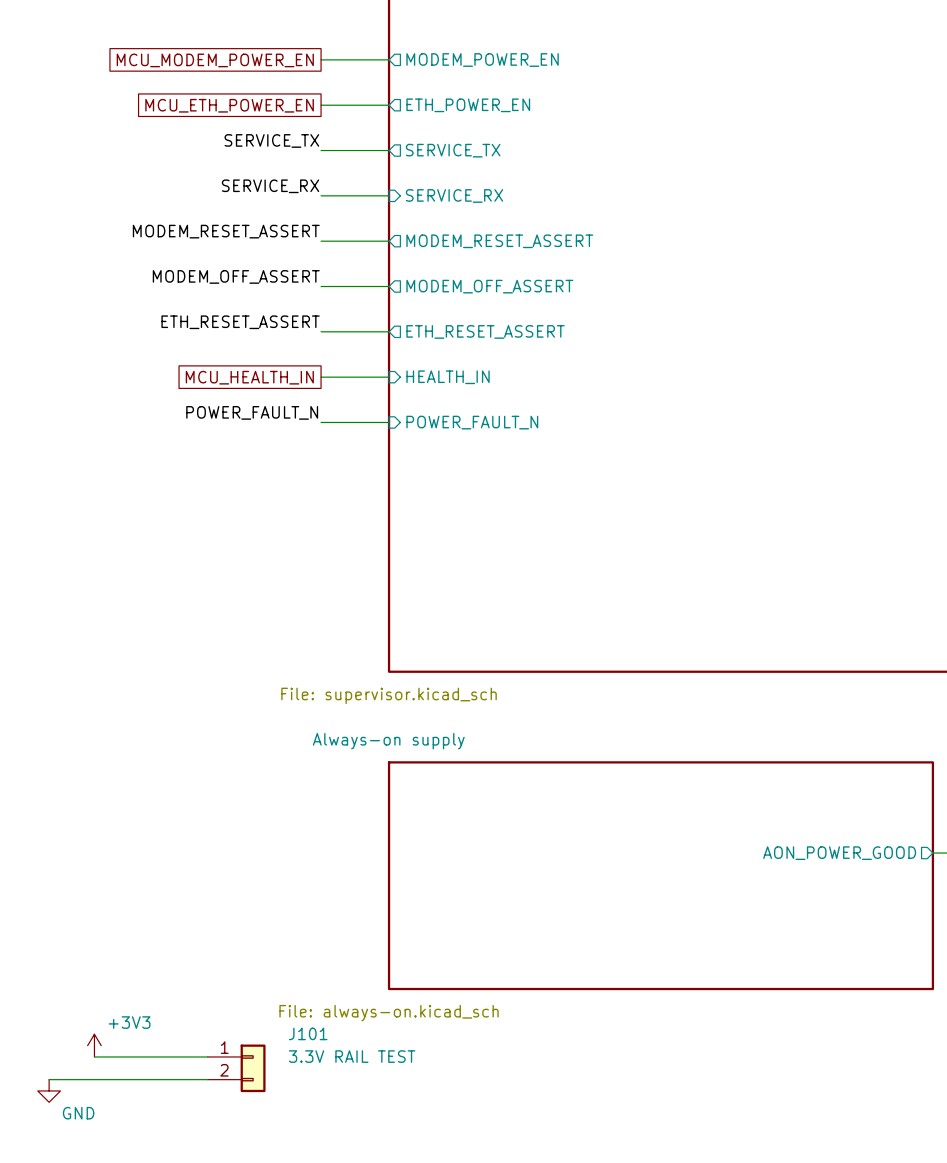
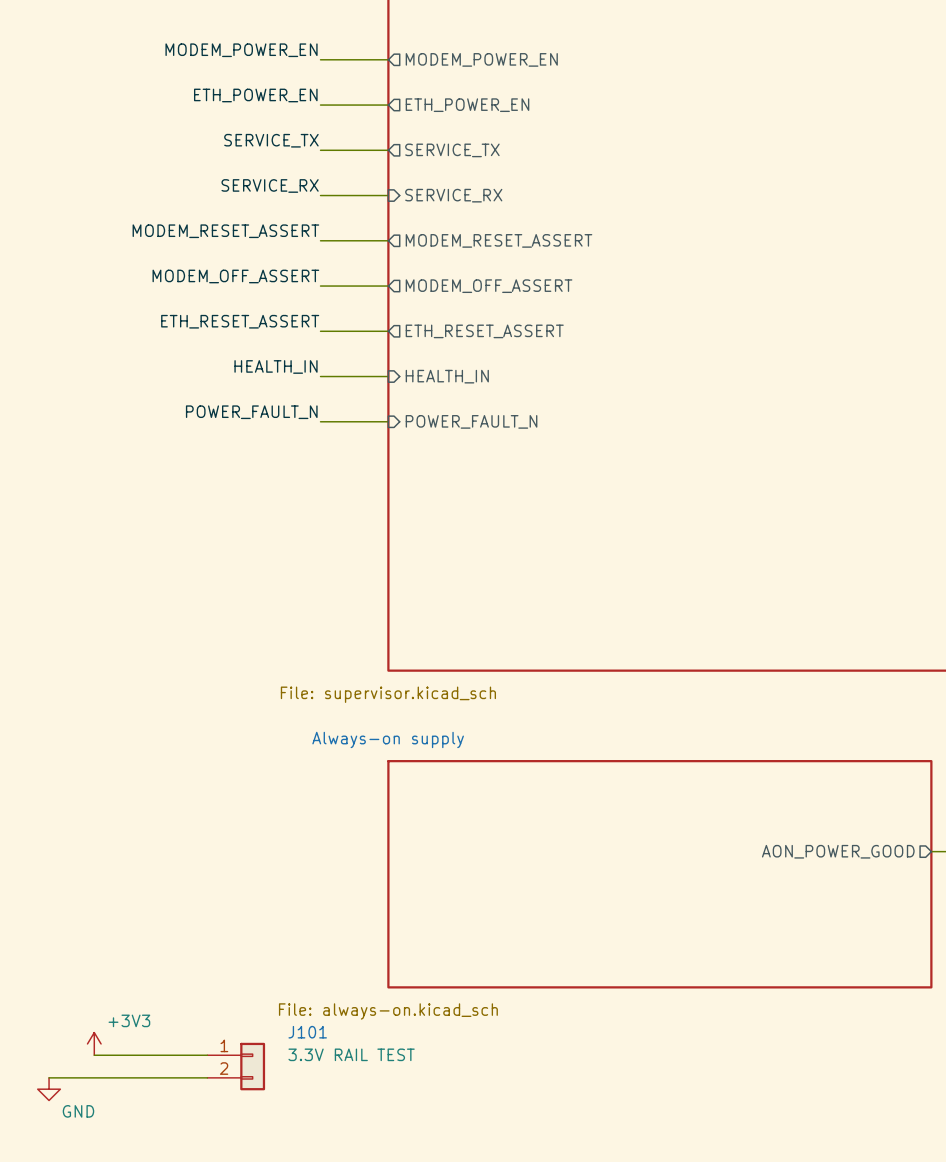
label: none -> MODEM_POWER_EN (241, 50)
global label: MCU_MODEM_POWER_EN (215, 60) -> none
label: none -> ETH_POWER_EN (255, 95)
global label: MCU_ETH_POWER_EN (229, 105) -> none
label: none -> HEALTH_IN (276, 366)
global label: MCU_HEALTH_IN (249, 377) -> none

